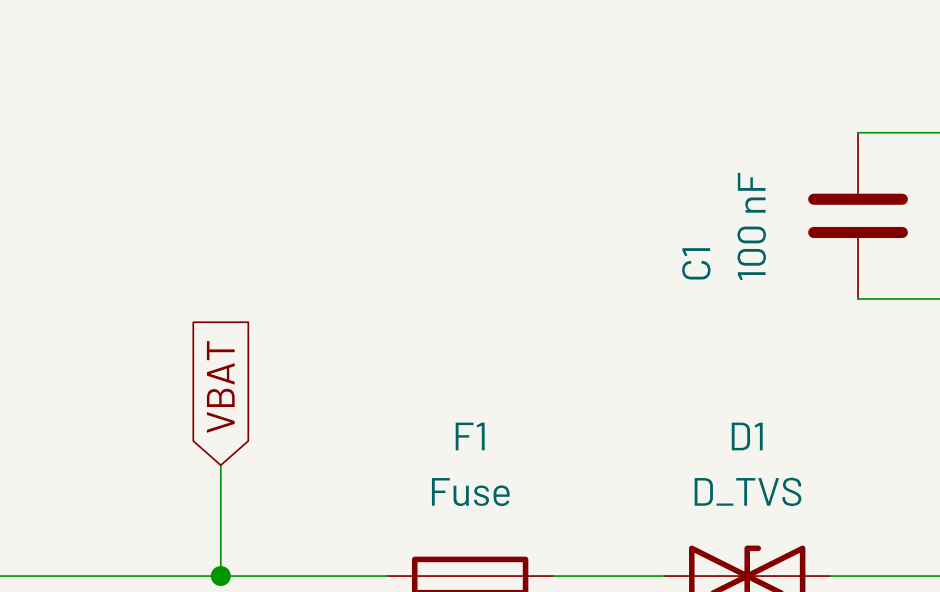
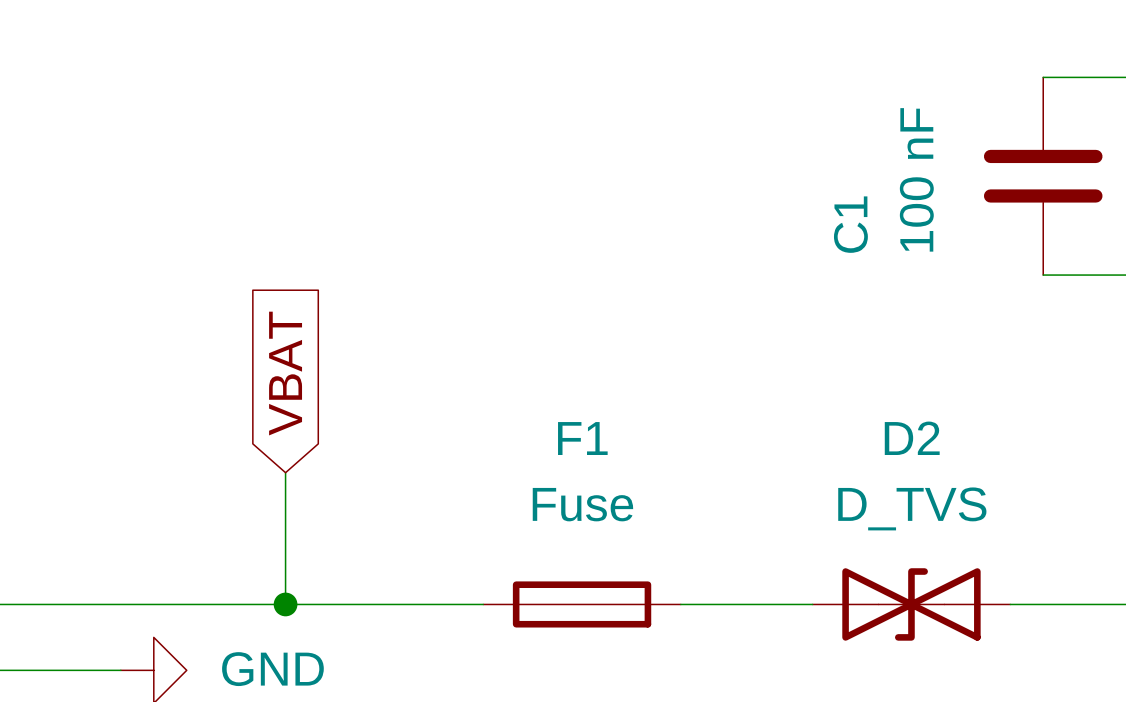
D1 name: D1 (747, 436) -> D2 (912, 438)

